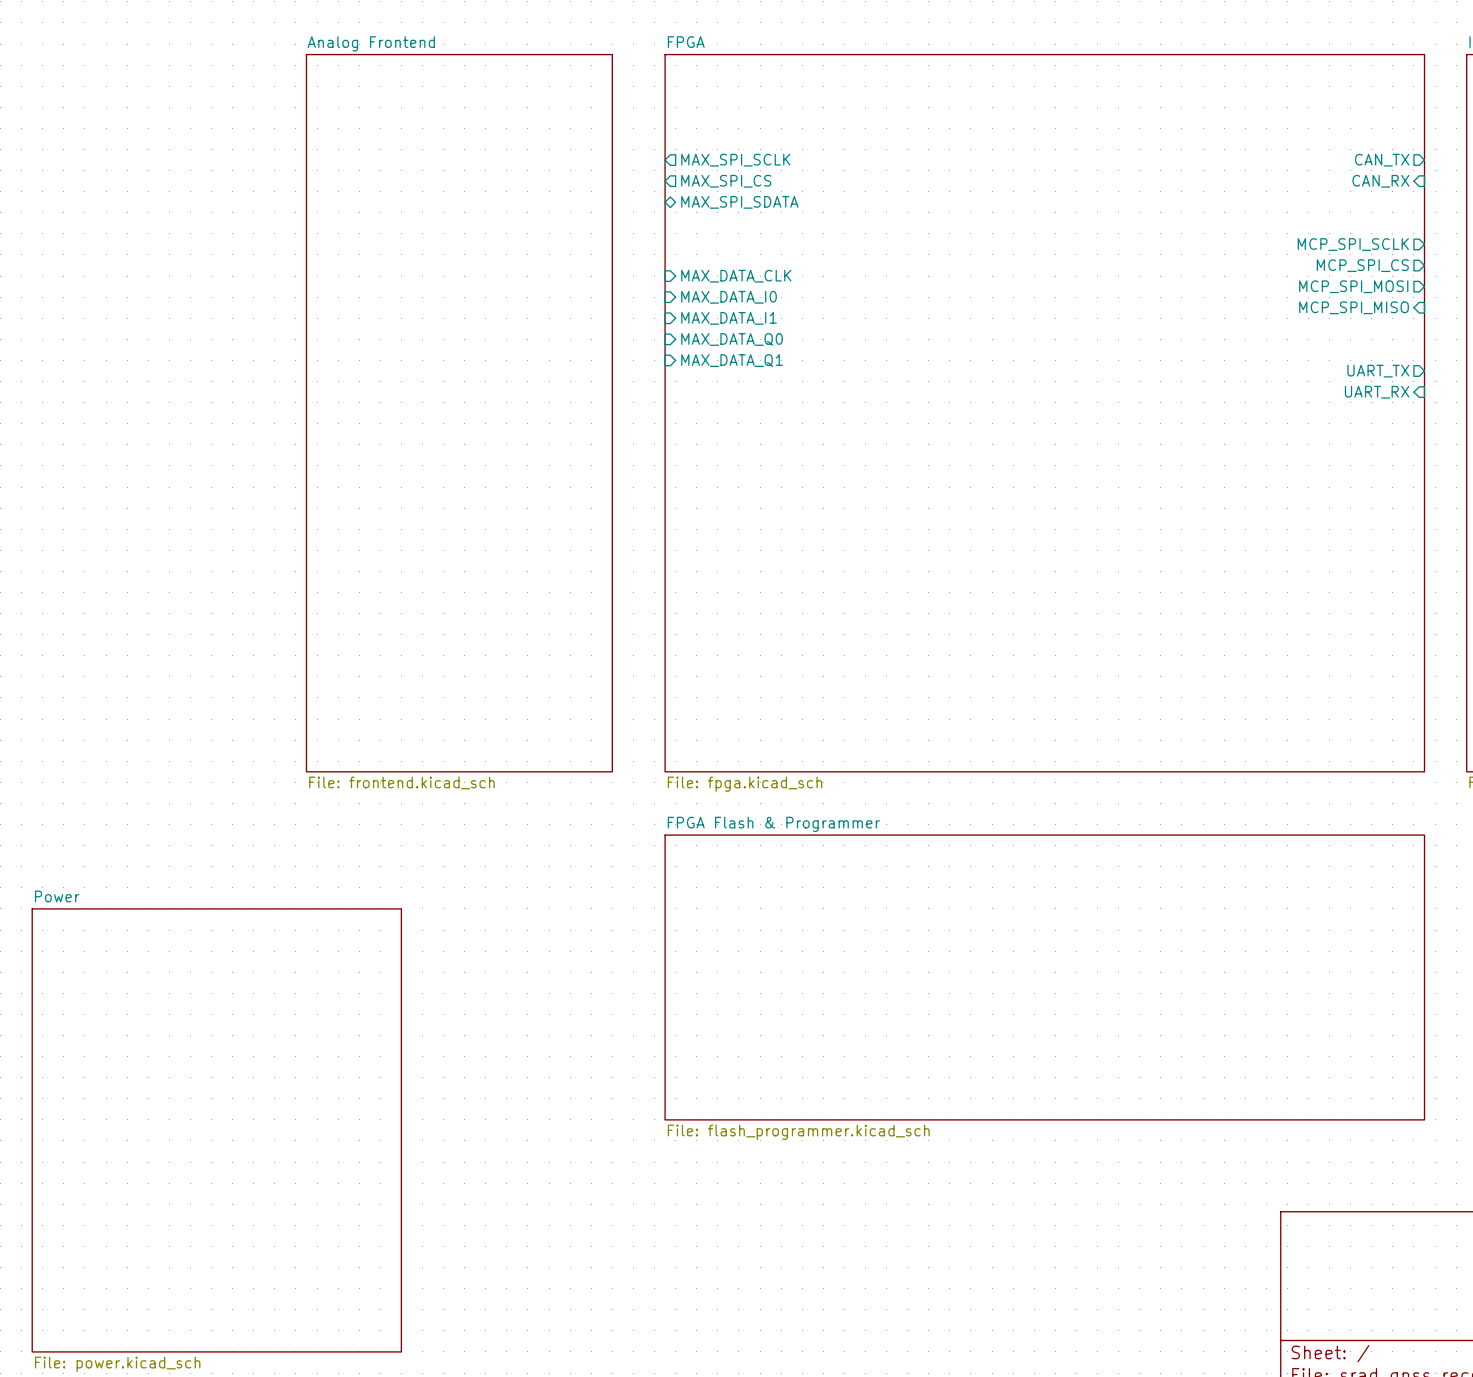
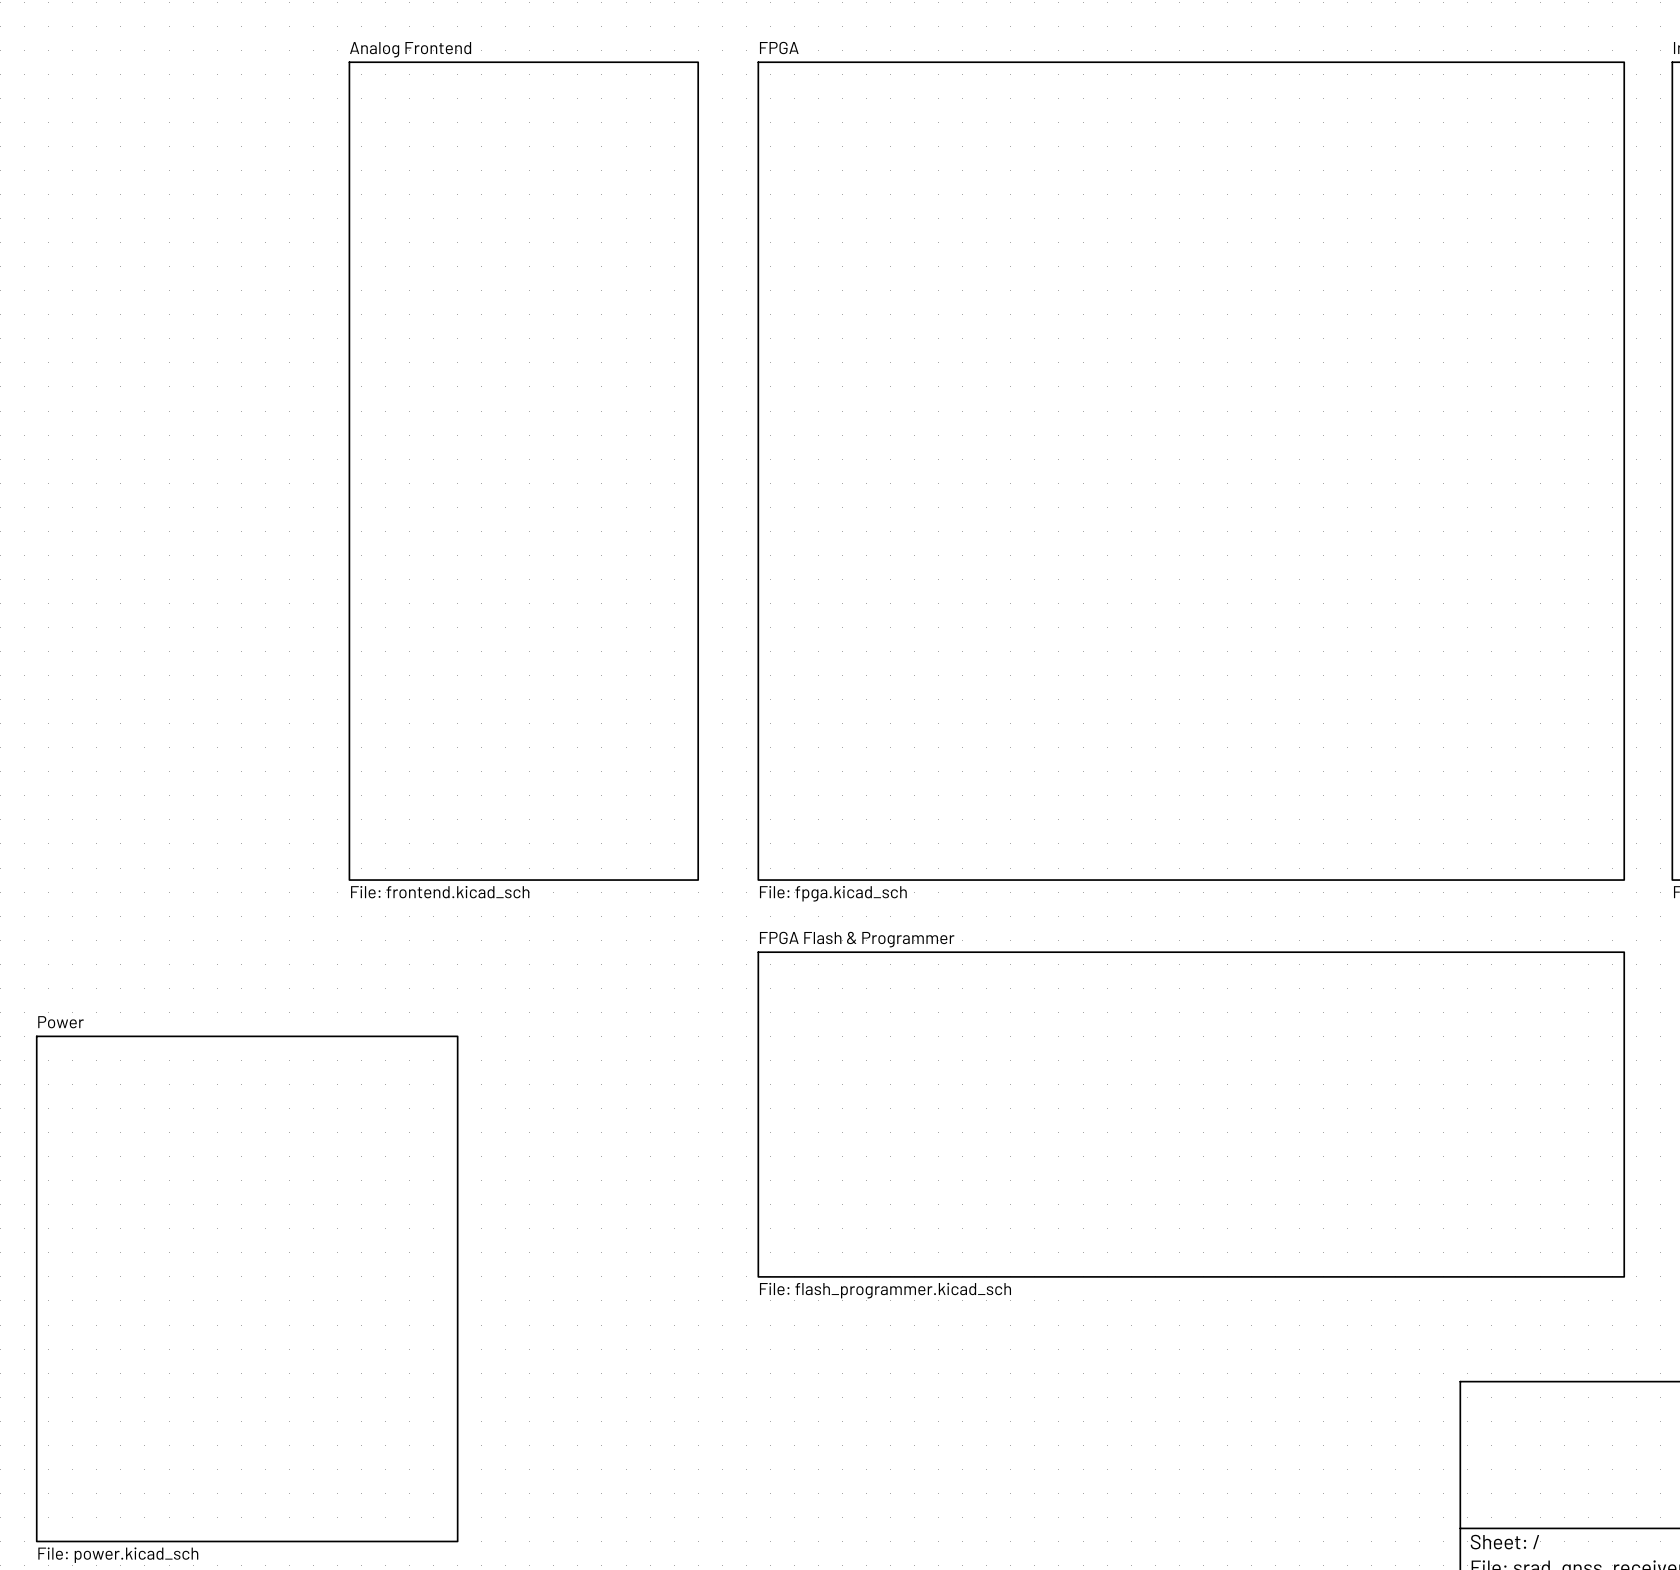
sheet pin: MAX_SPI_SCLK (735, 160) -> none
sheet pin: CAN_TX (1382, 160) -> none
sheet pin: MAX_SPI_CS (726, 181) -> none
sheet pin: CAN_RX (1380, 181) -> none
sheet pin: MAX_SPI_SDATA (739, 202) -> none
sheet pin: MCP_SPI_SCLK (1353, 244) -> none
sheet pin: MCP_SPI_CS (1362, 265) -> none
sheet pin: MAX_DATA_CLK (736, 276) -> none
sheet pin: MCP_SPI_MOSI (1353, 286) -> none
sheet pin: MAX_DATA_I0 (729, 297) -> none
sheet pin: MCP_SPI_MISO (1354, 307) -> none
sheet pin: MAX_DATA_I1 (729, 318) -> none
sheet pin: MAX_DATA_Q0 (732, 339) -> none
sheet pin: MAX_DATA_Q1 (732, 360) -> none
sheet pin: UART_TX (1378, 371) -> none
sheet pin: UART_RX (1377, 392) -> none

